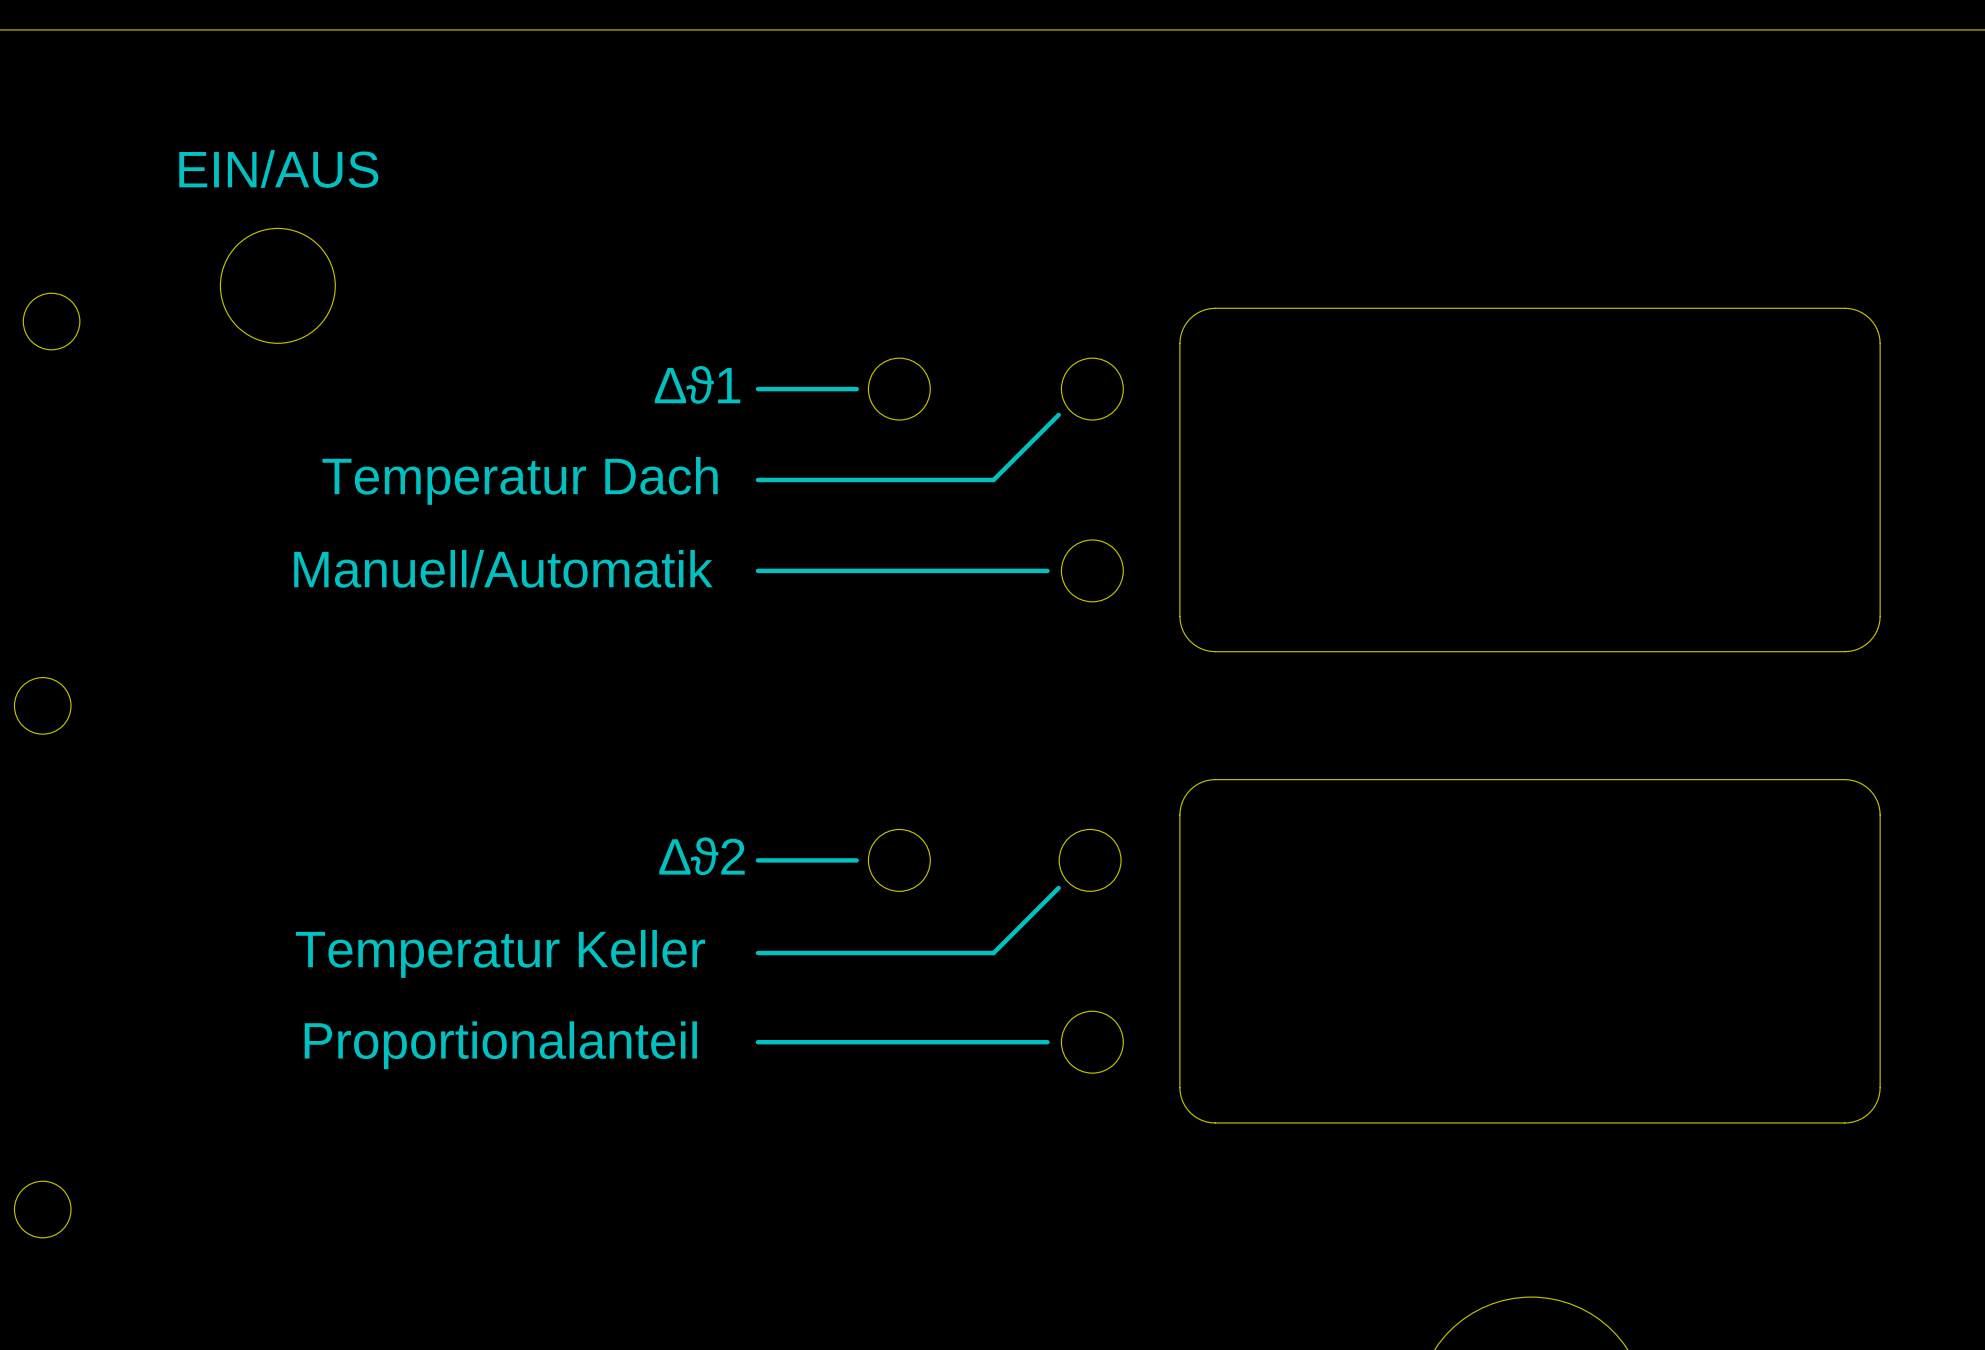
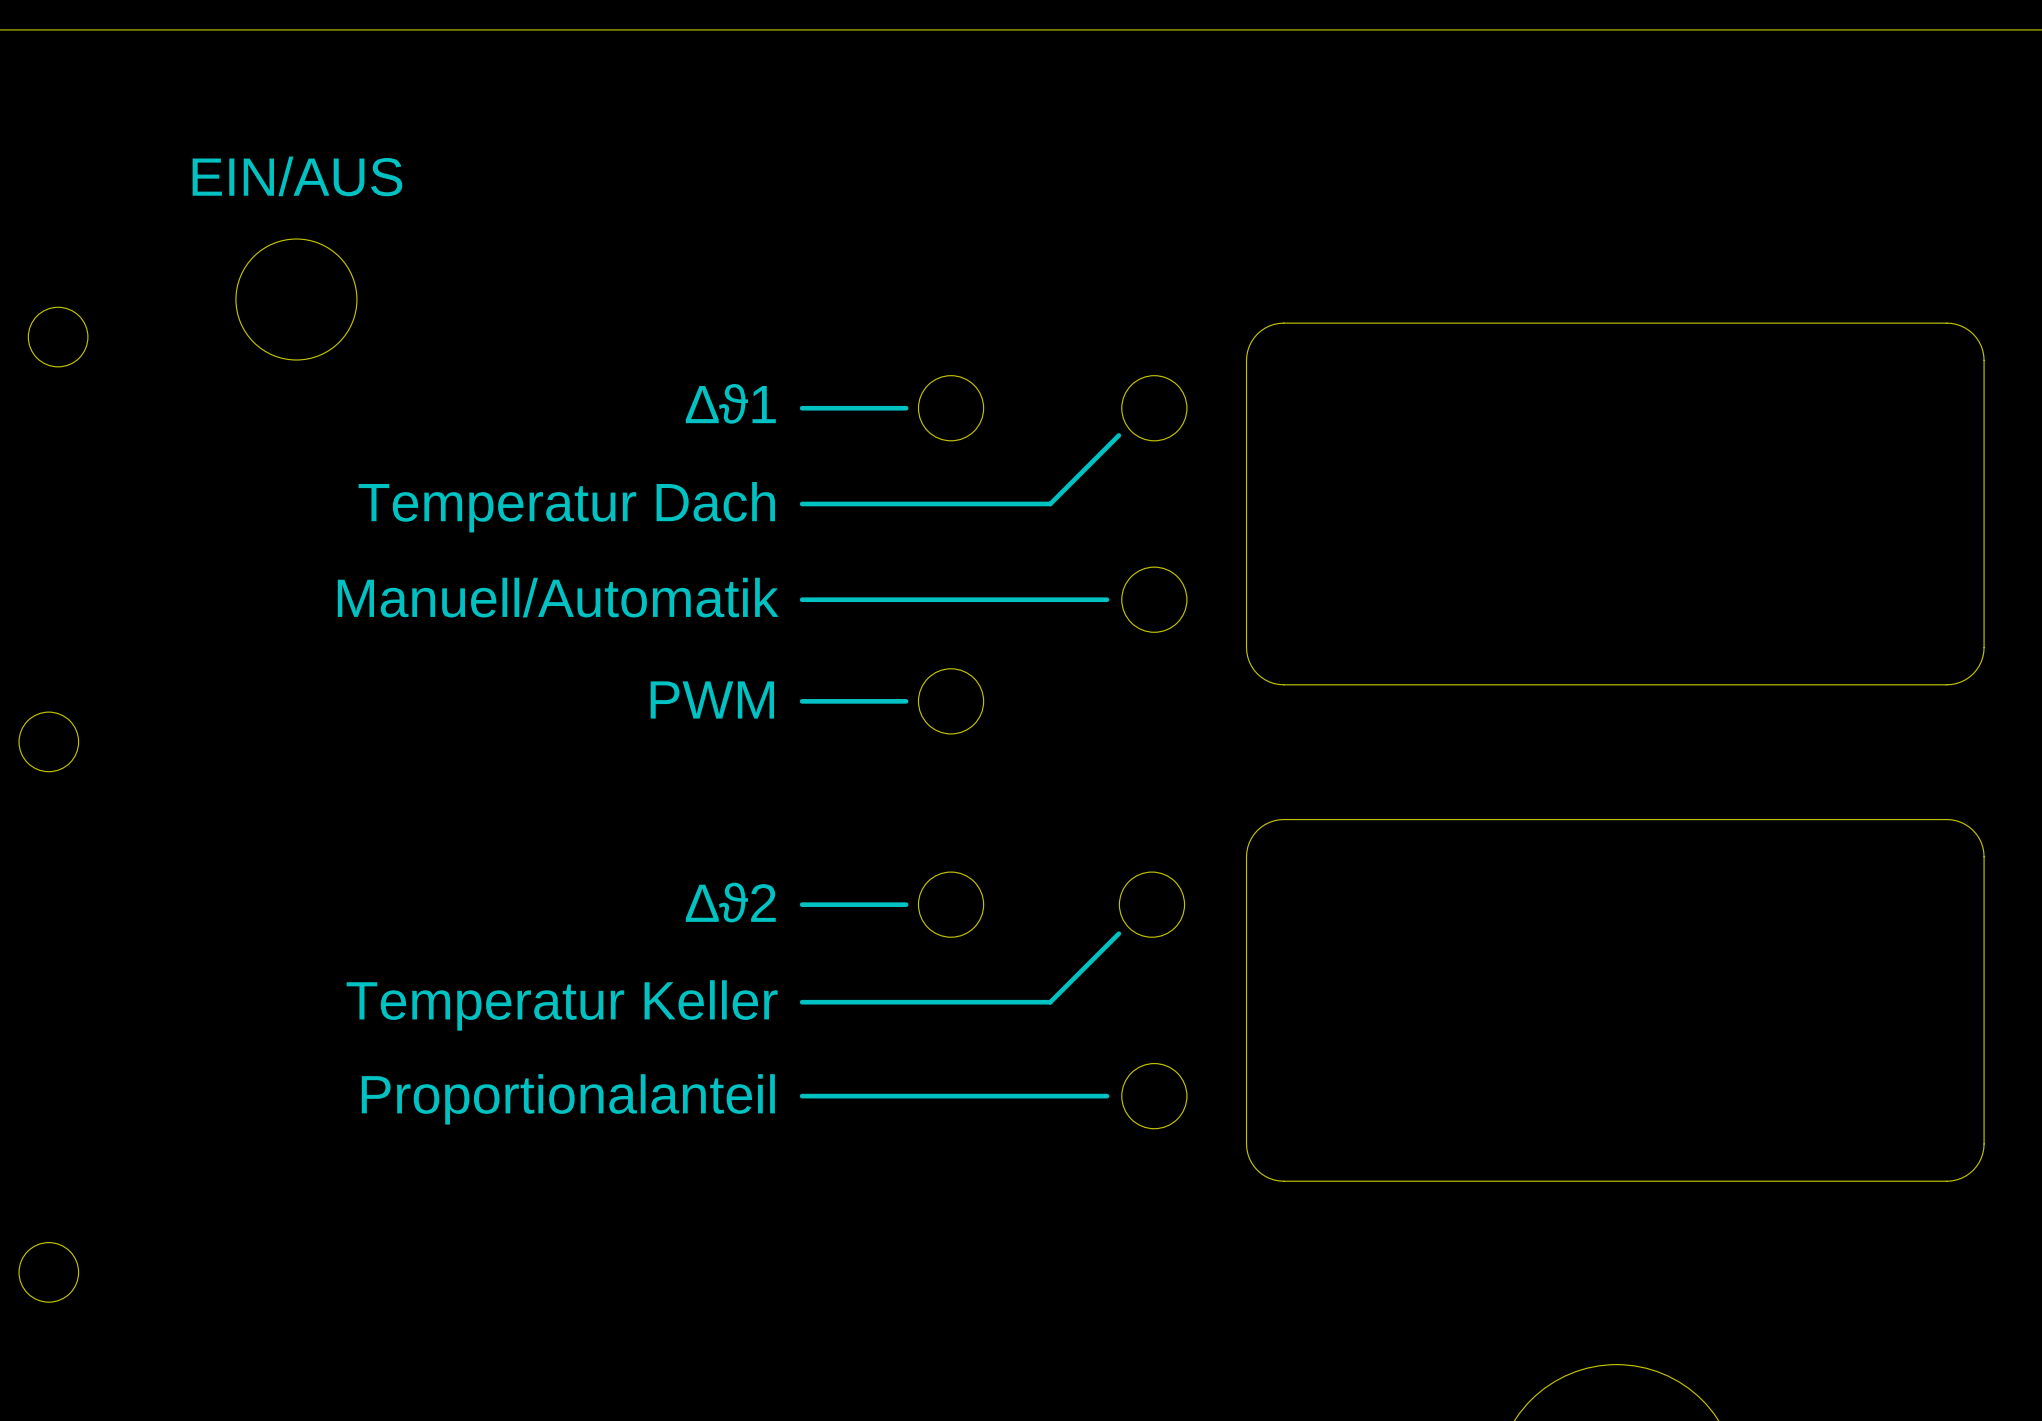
text position: ∆ϑ1 (697, 384) -> ∆ϑ1 (730, 403)
text position: Temperatur Dach (520, 480) -> Temperatur Dach (566, 507)
text position: Manuell/Automatik (503, 568) -> Manuell/Automatik (558, 597)
round board edge: none -> [918, 668, 985, 735]
text: none -> PWM (712, 699)
line: none -> (802, 701) (906, 701)
text position: ∆ϑ2 (702, 856) -> ∆ϑ2 (730, 902)
text position: Temperatur Keller (500, 953) -> Temperatur Keller (562, 1005)
text position: Proportionalanteil (500, 1045) -> Proportionalanteil (568, 1099)

